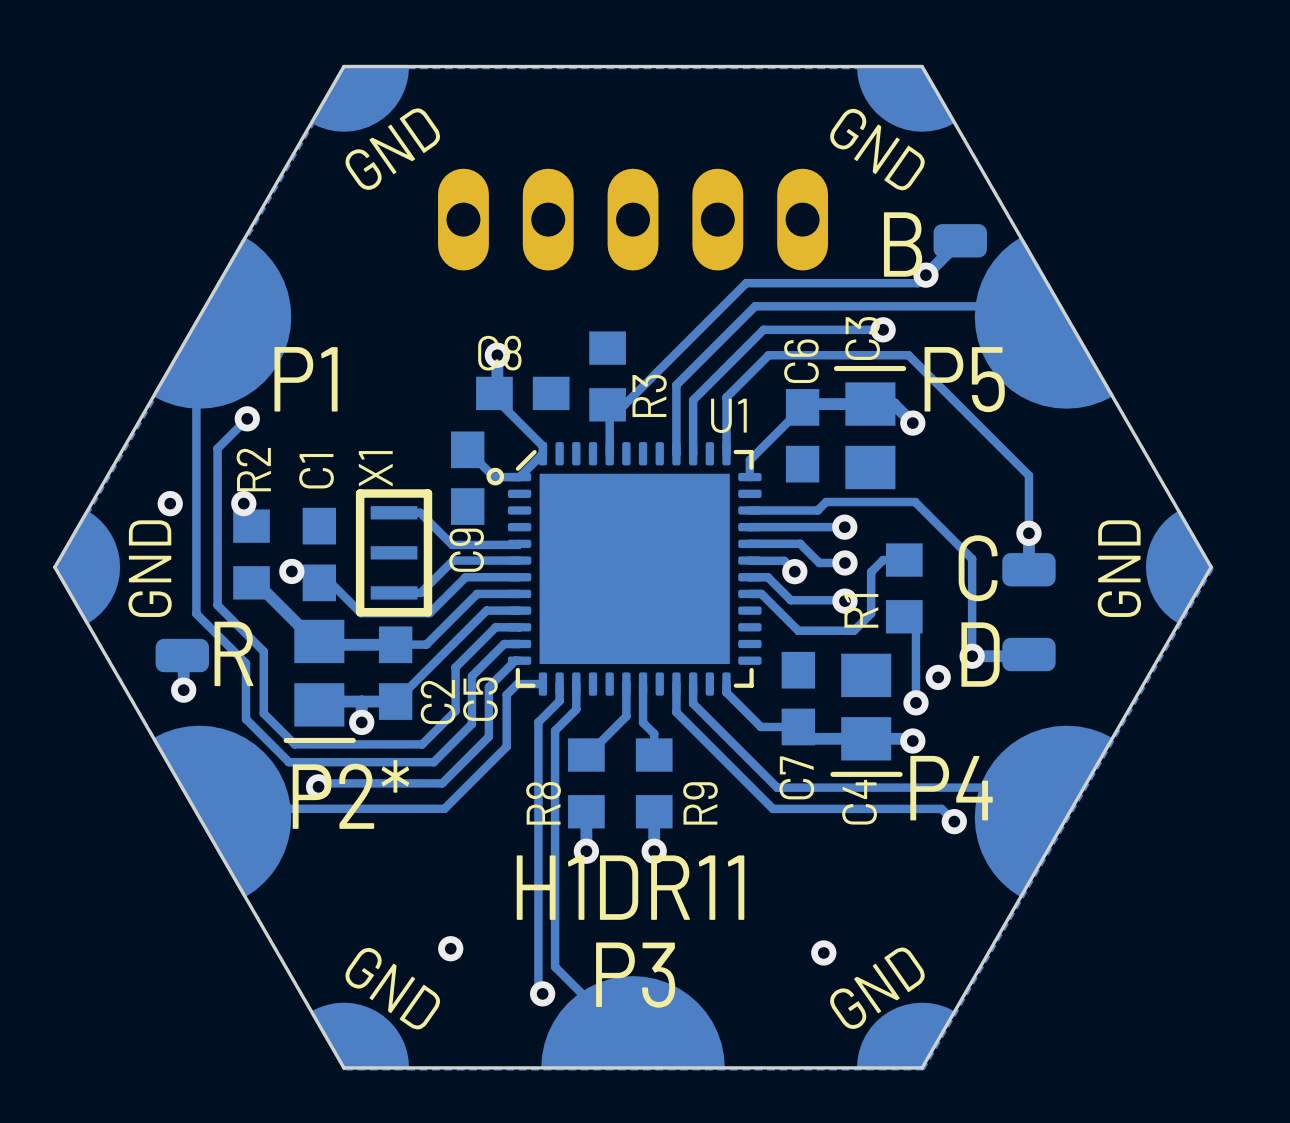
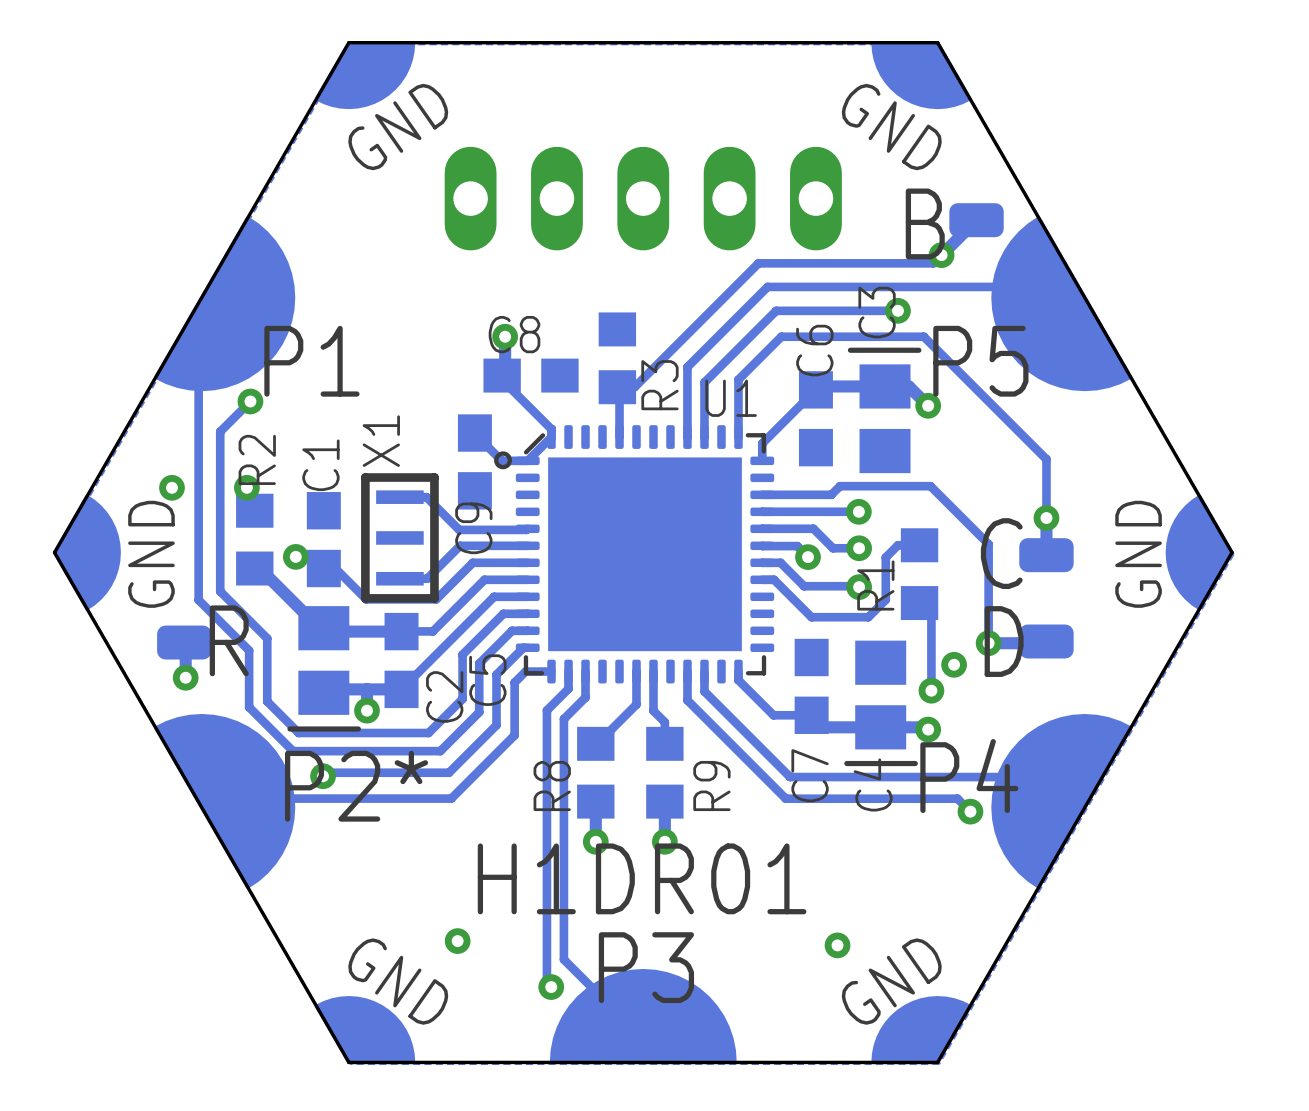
text: H1DR11 (630, 887) -> H1DR01 (642, 878)

